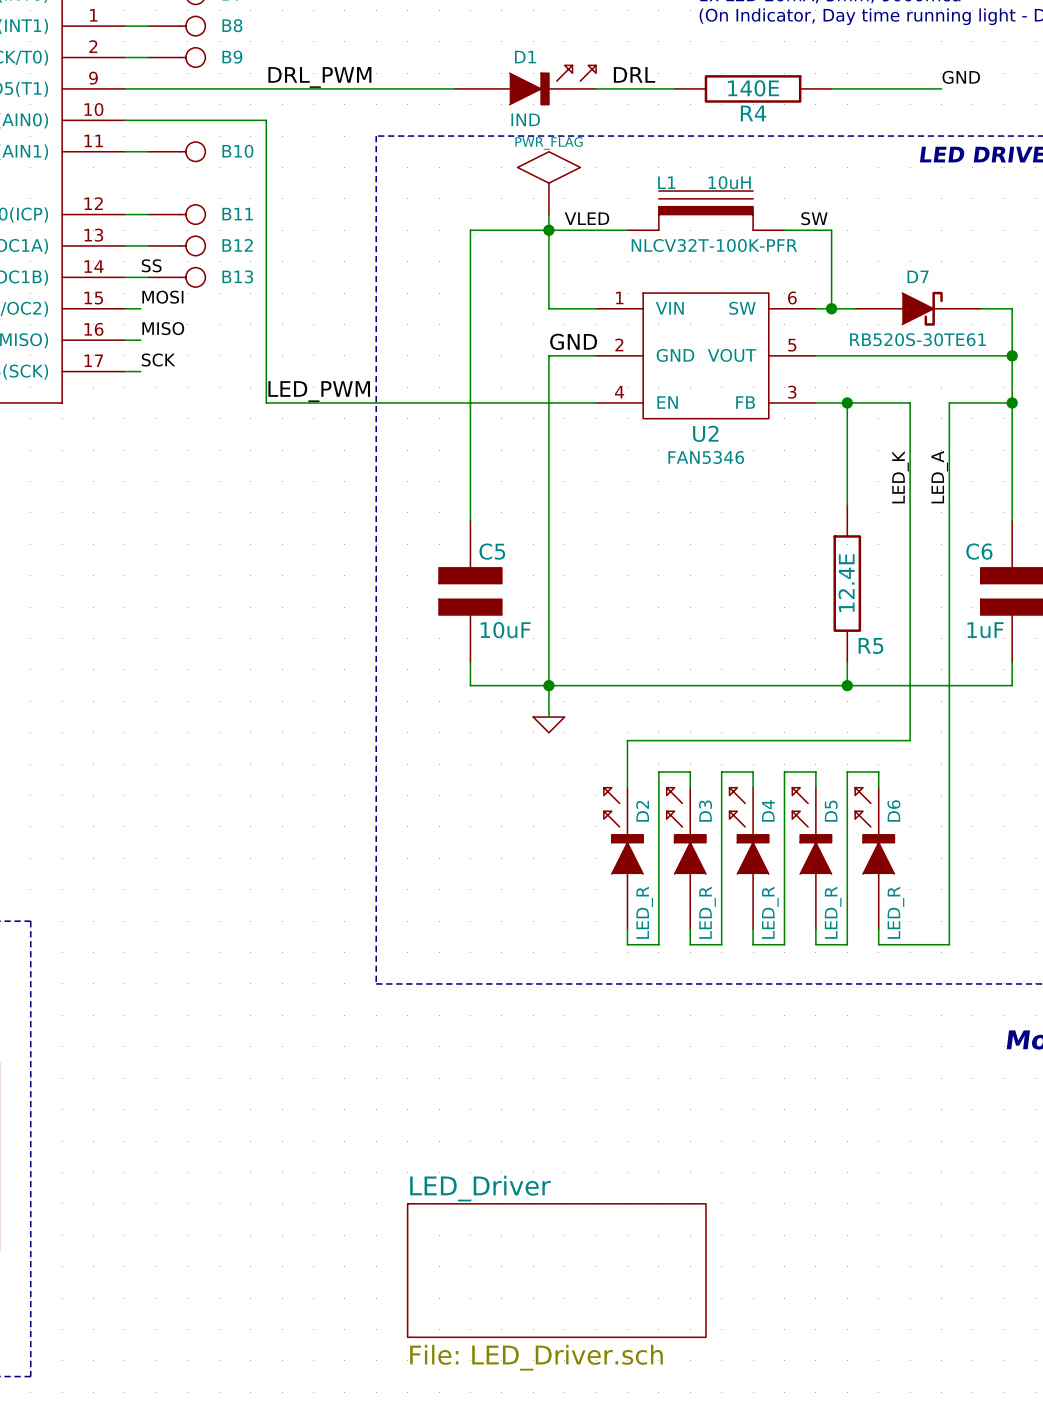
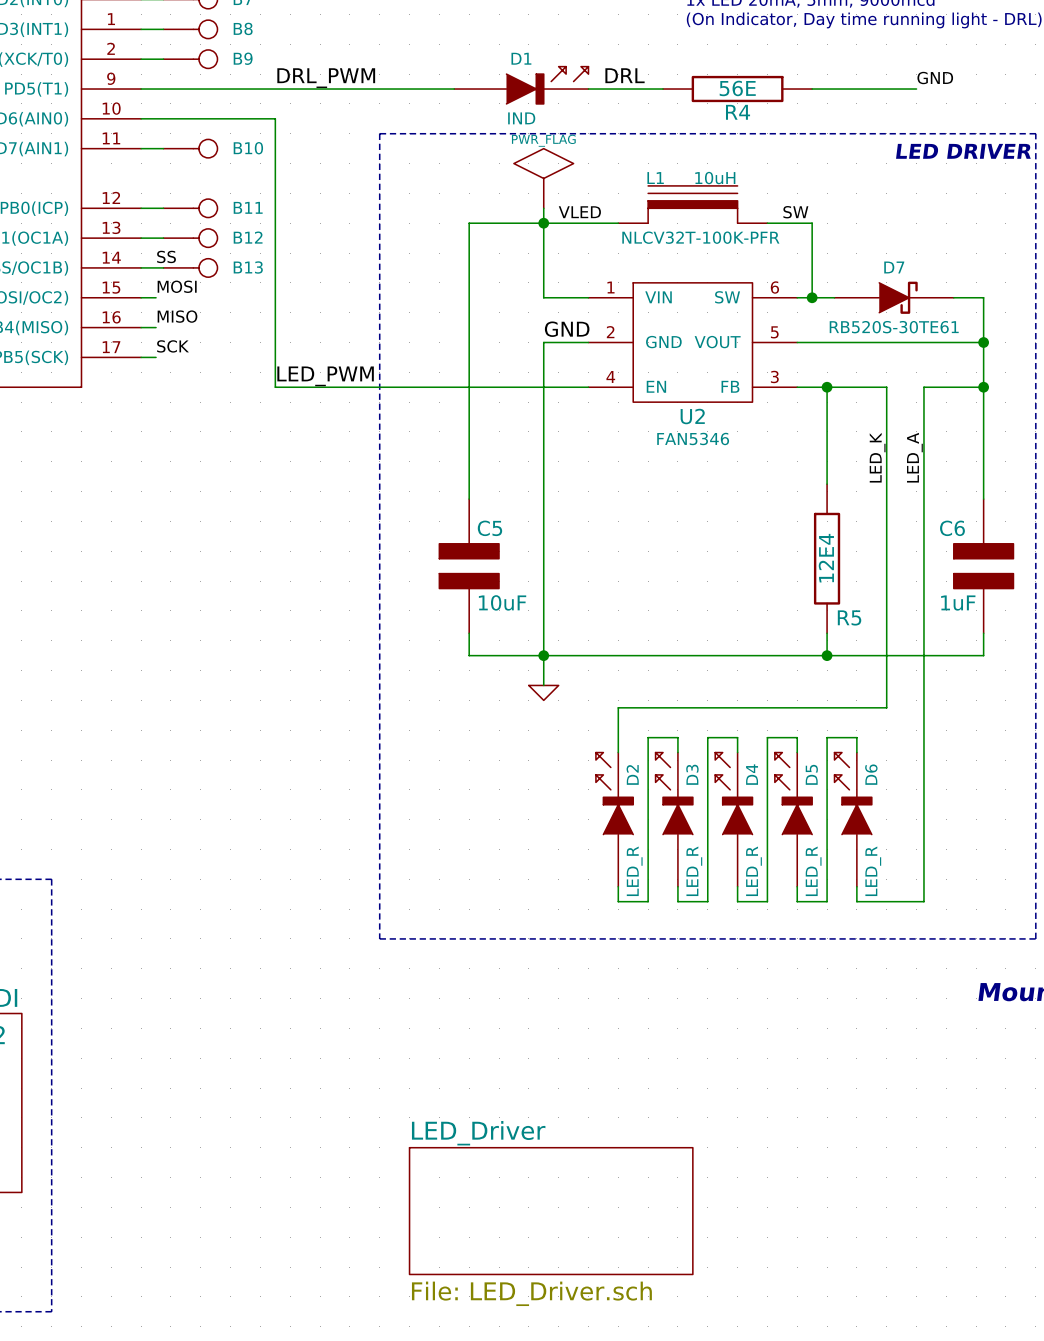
R4 value: 140E (753, 88) -> 56E (737, 88)
R5 value: 12.4E (846, 583) -> 12E4 (826, 558)

